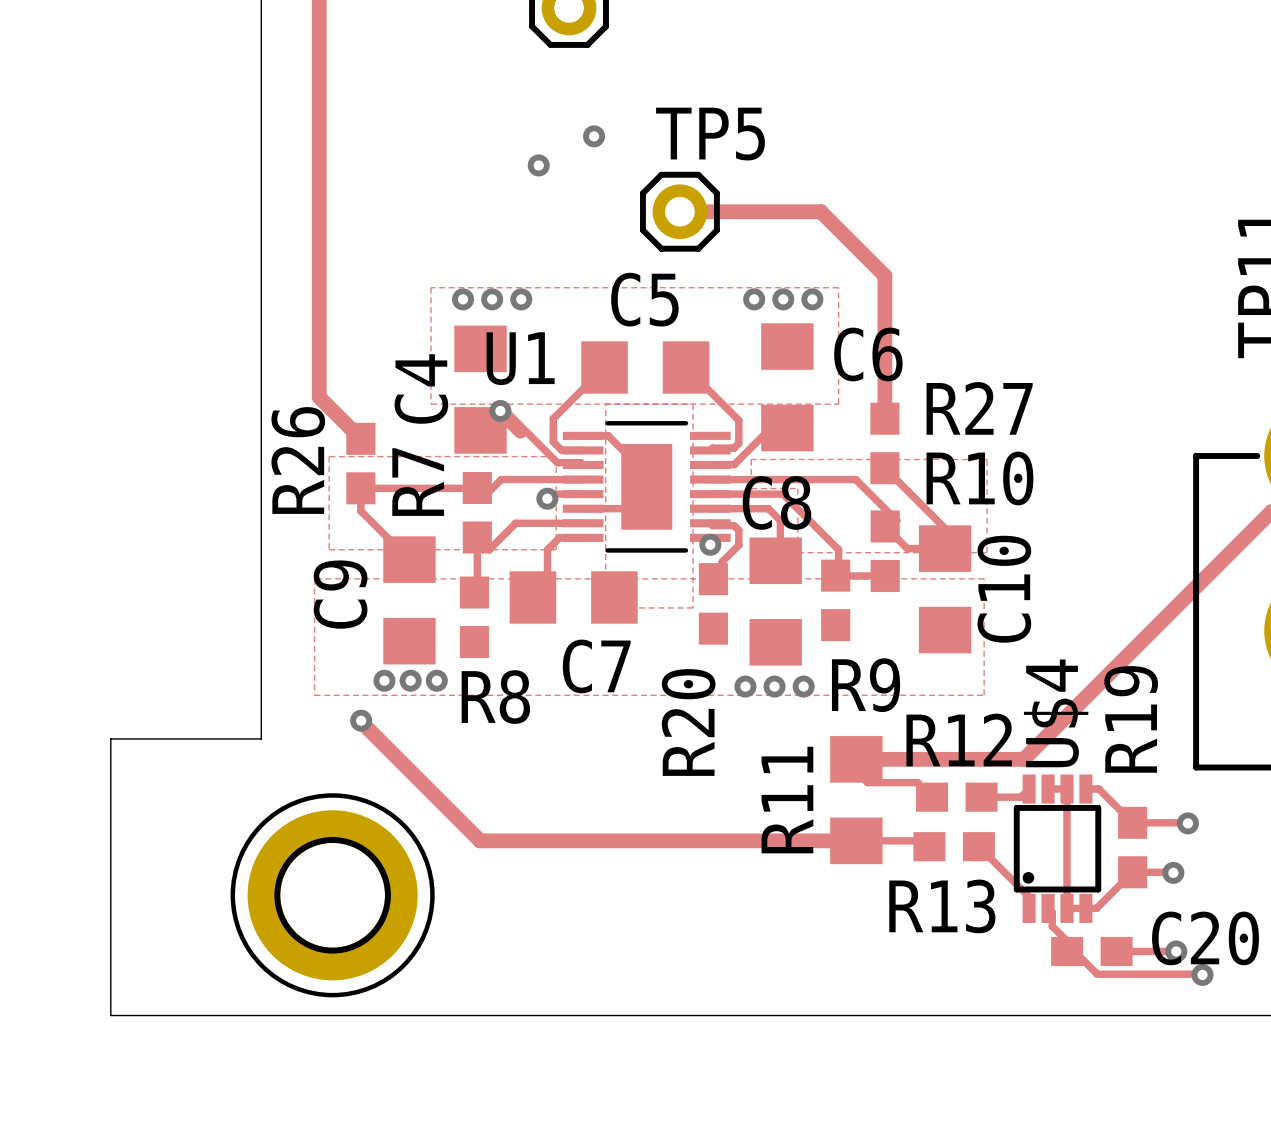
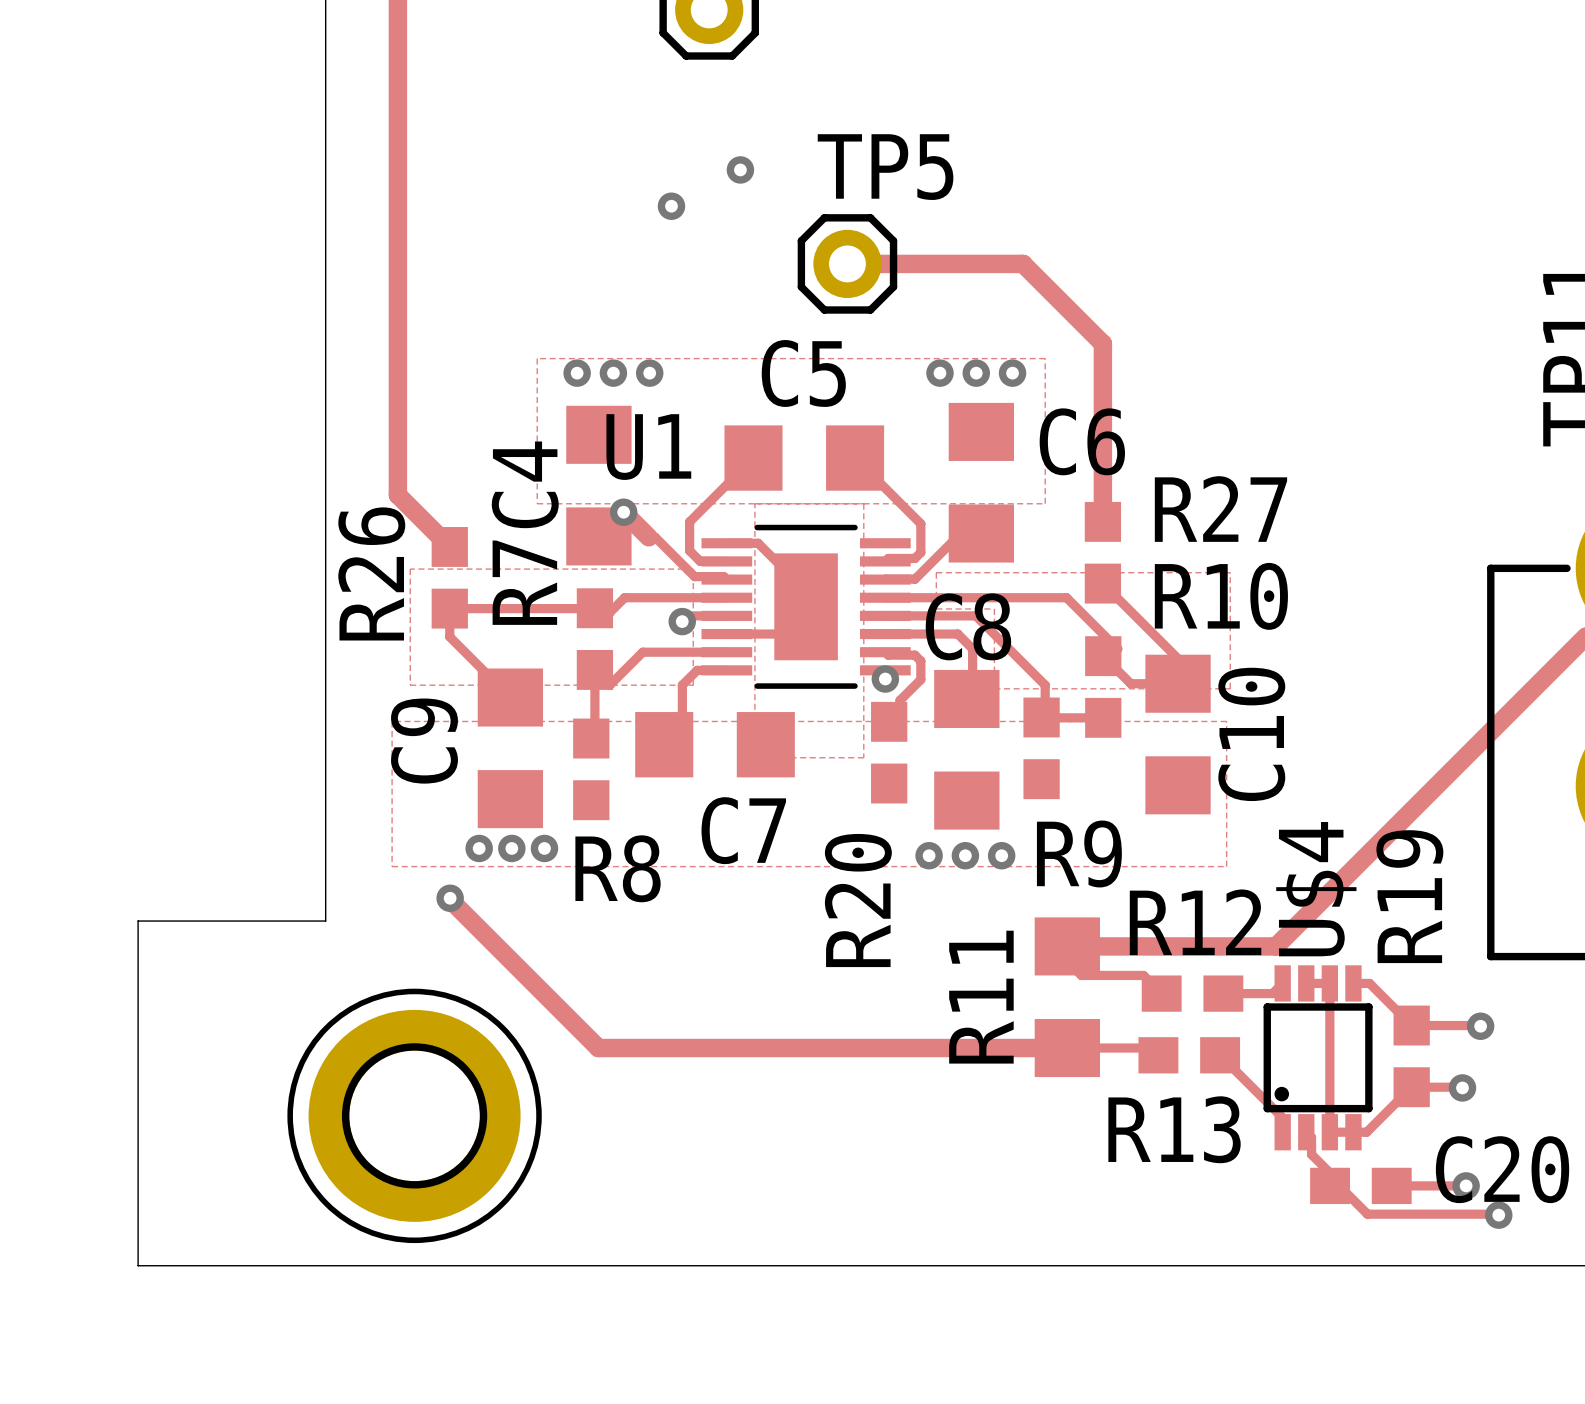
R7 name position: R7 (418, 482) -> R7 (524, 582)

